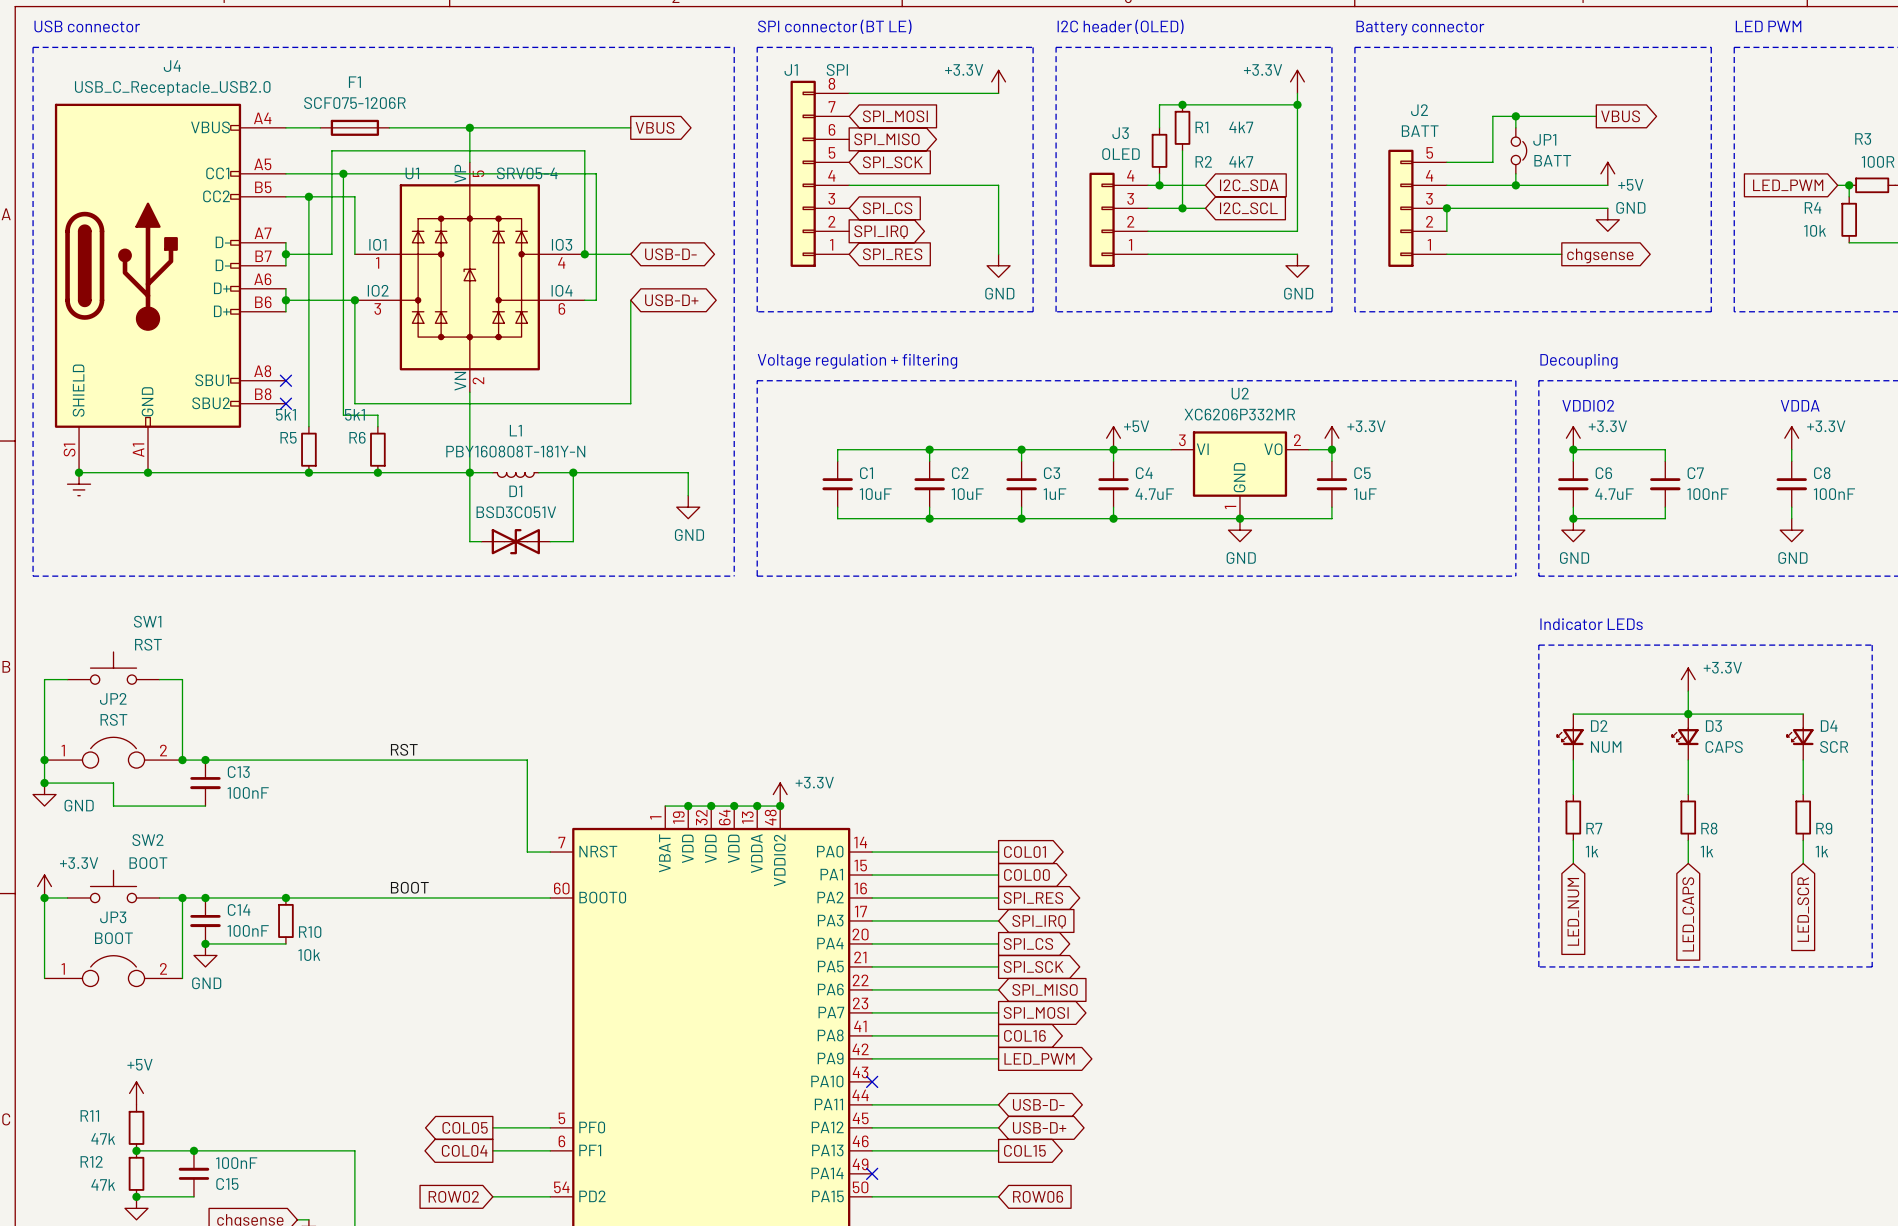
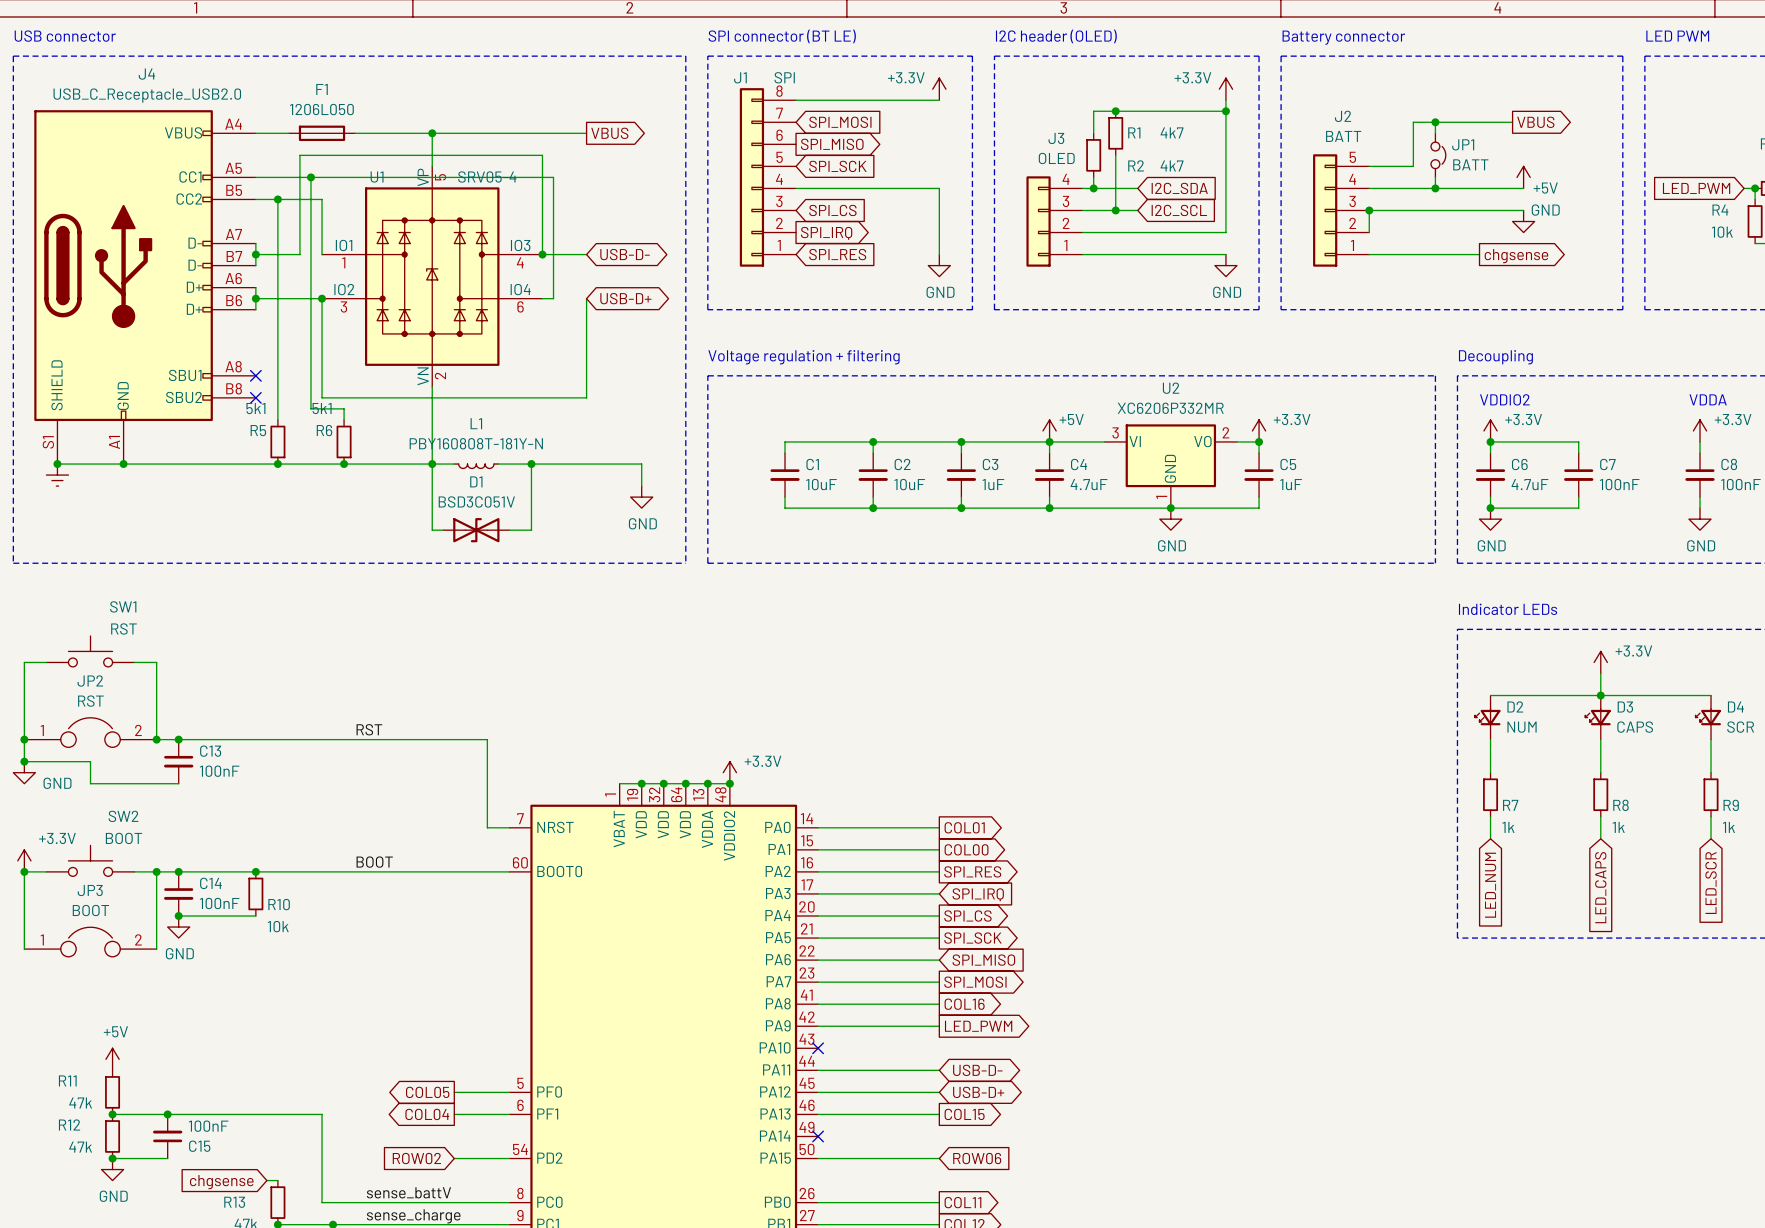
F1 value: SCF075-1206R (354, 103) -> 1206L050 (321, 109)

